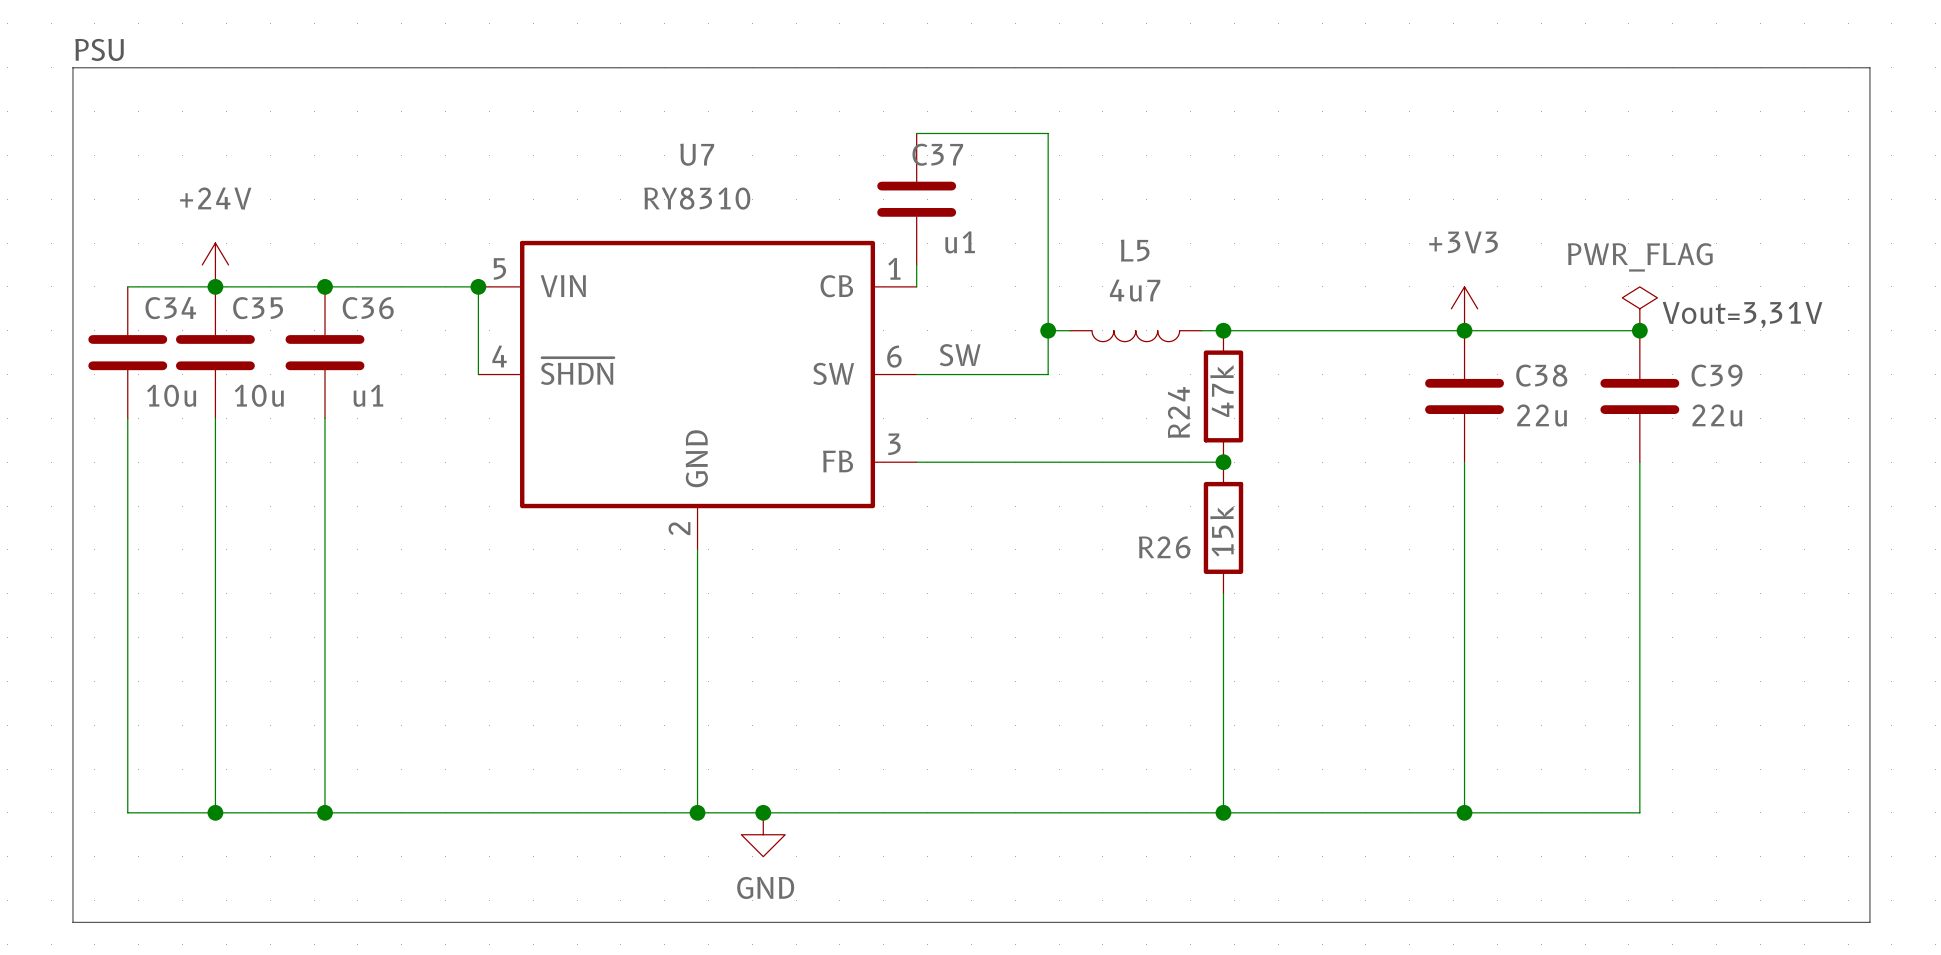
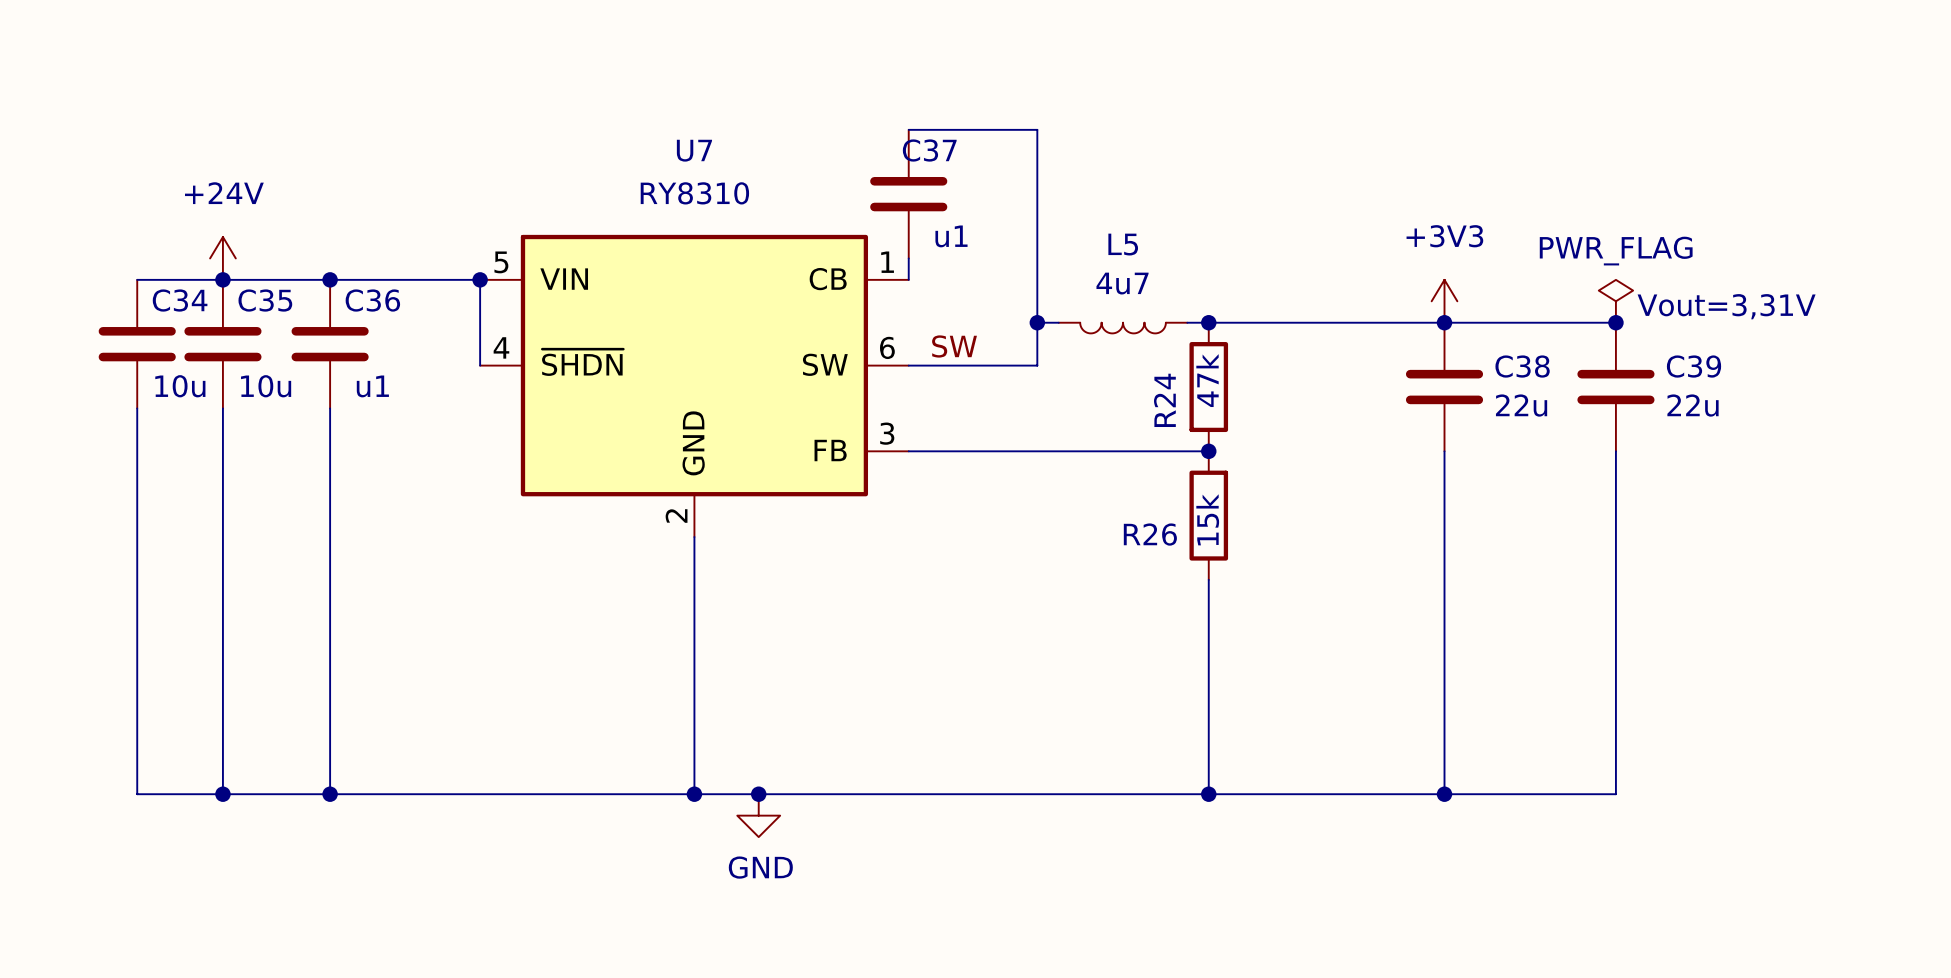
text: PSU (99, 49) -> none
line: (72, 67) (1869, 67) (1869, 922) (72, 922) (72, 67) -> none

